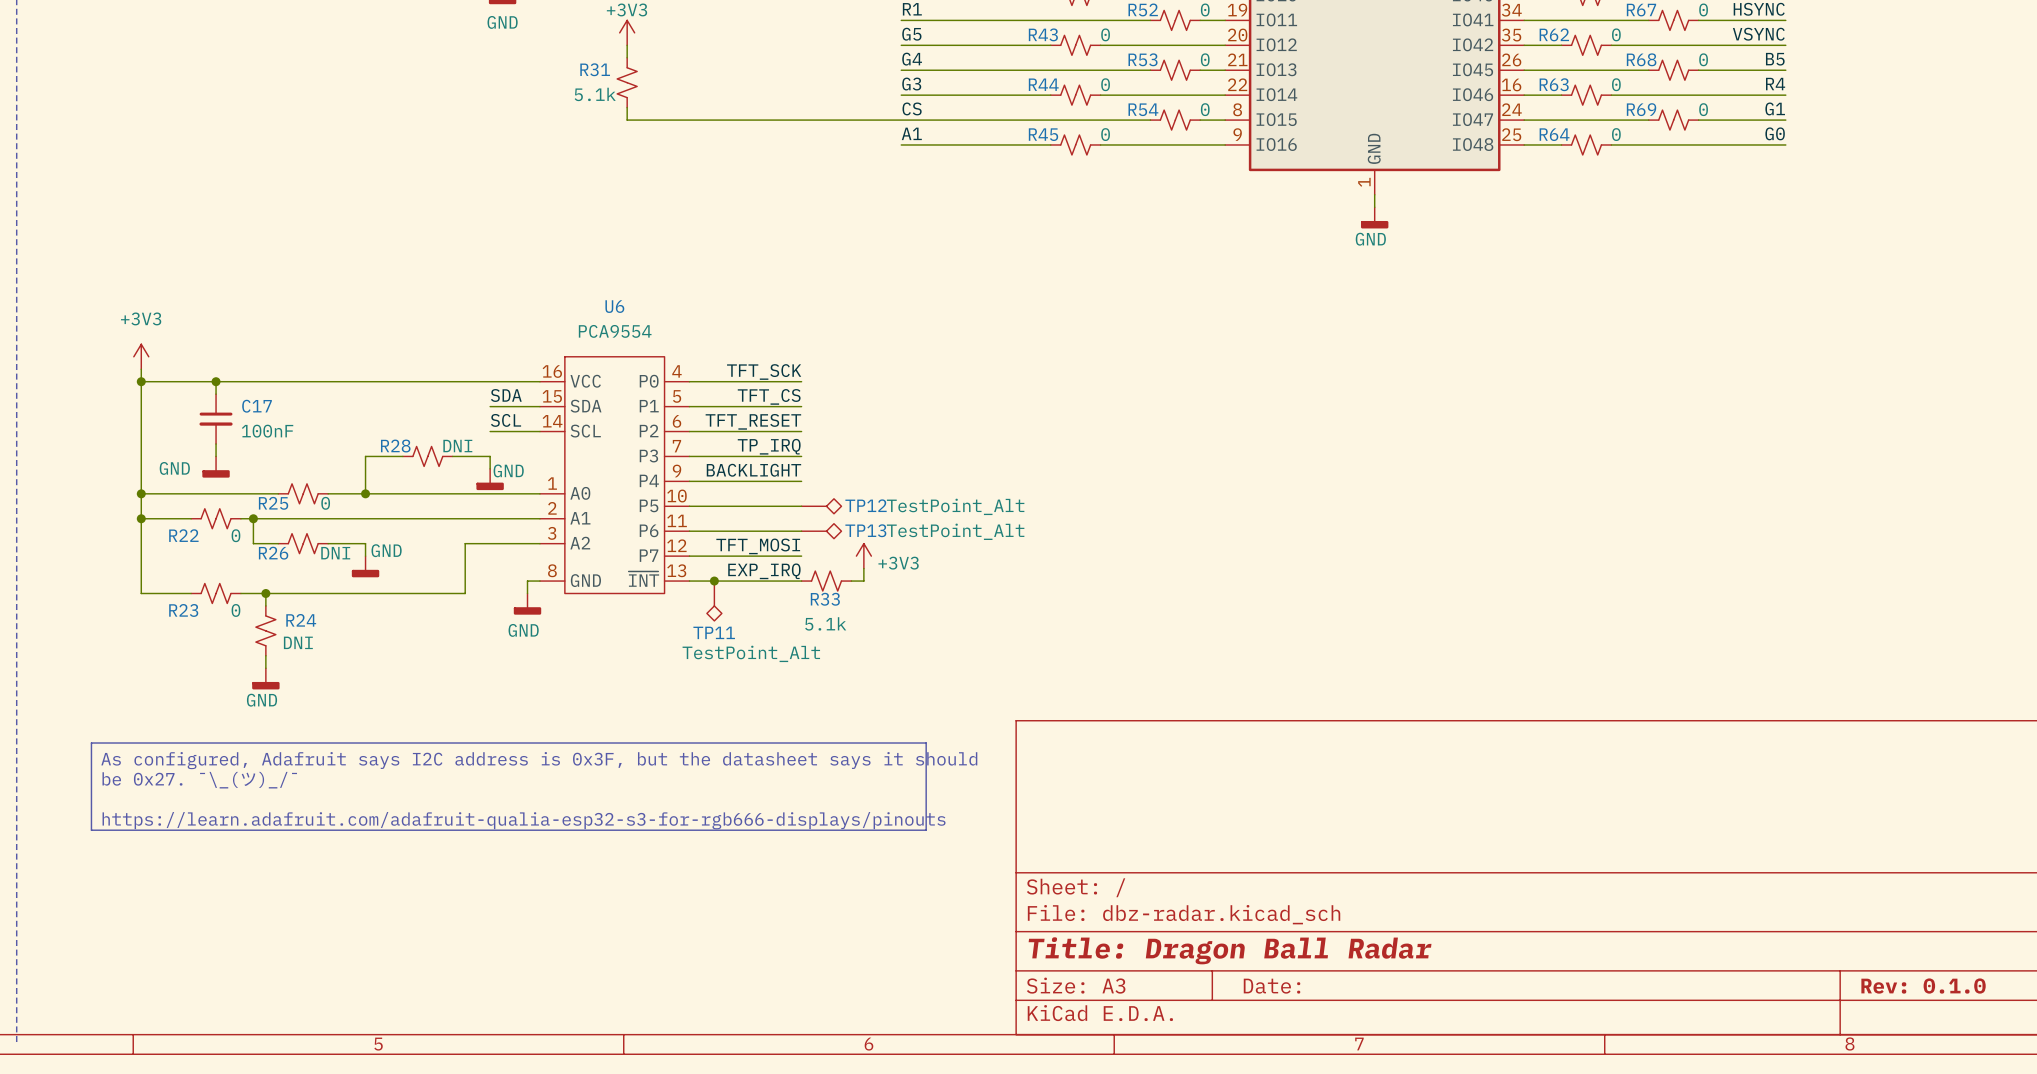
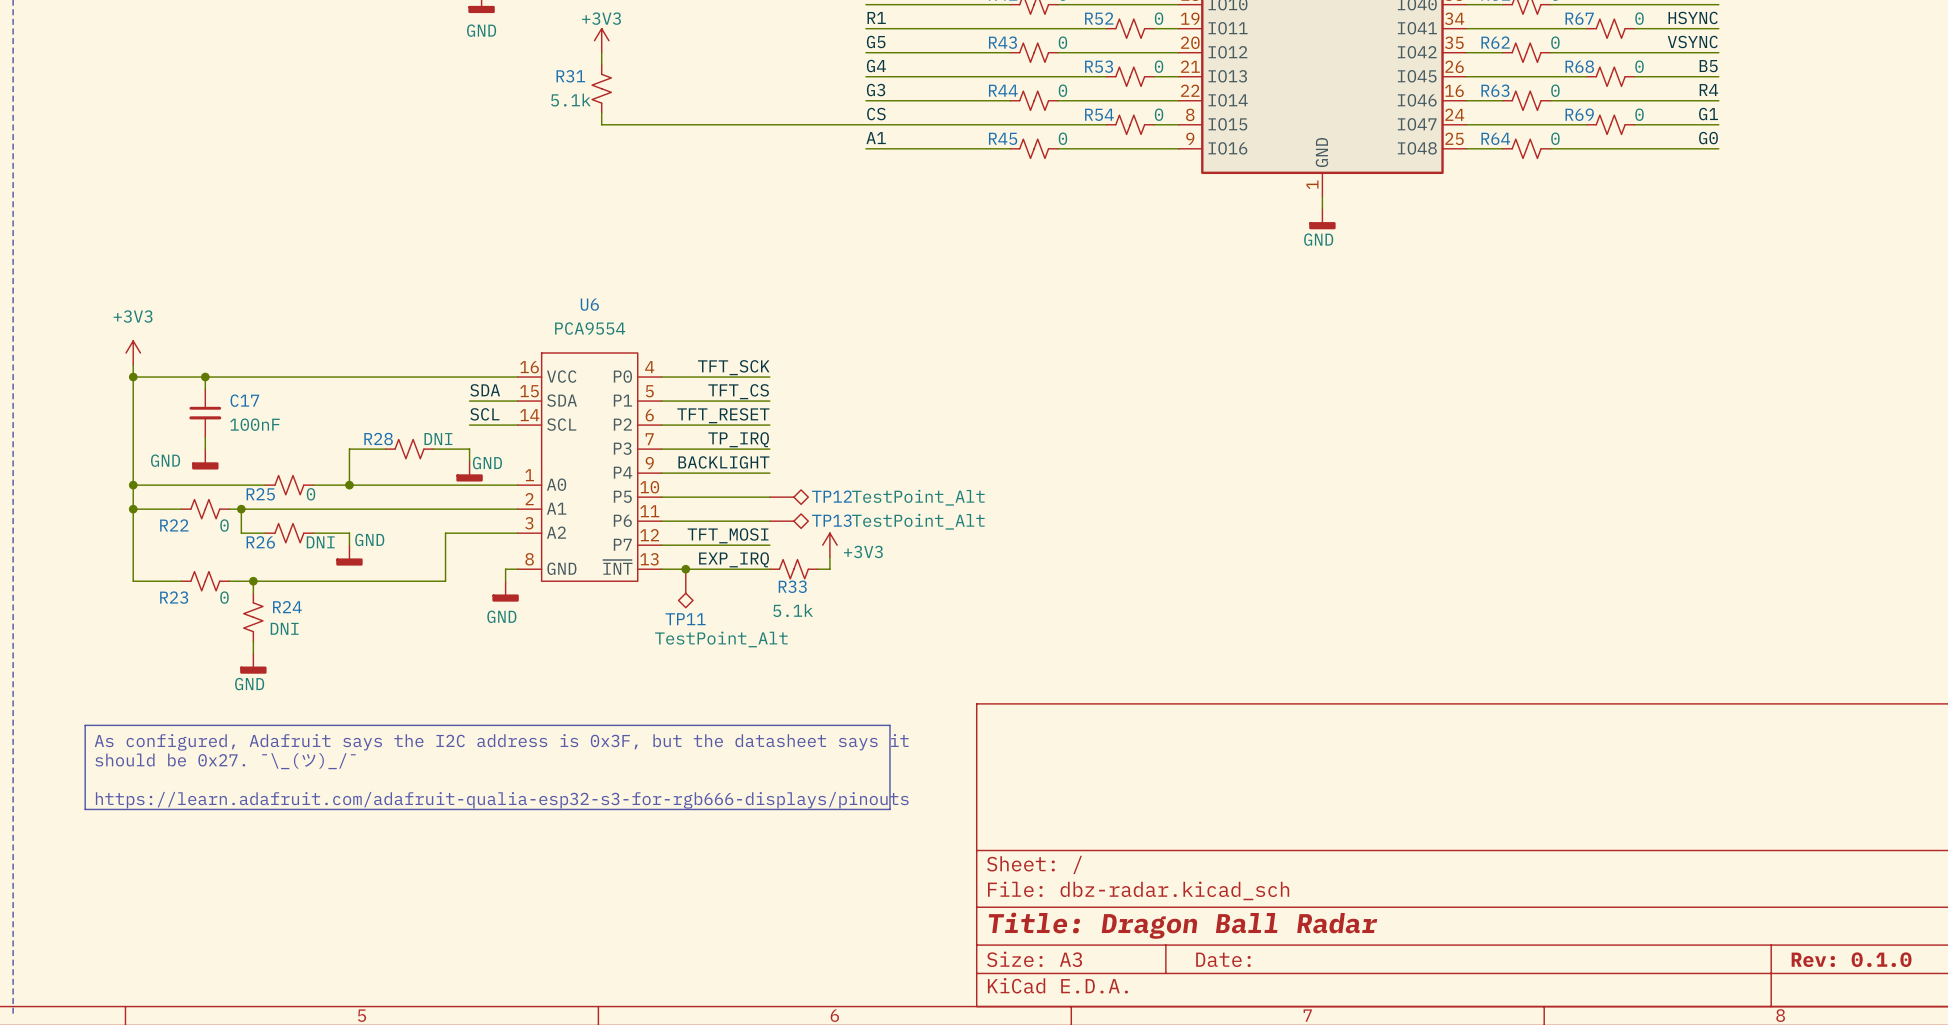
text: As configured, Adafruit says I2C address is 0x3F, but the datasheet says it should (539, 760) -> As configured, Adafruit says the I2C address is 0x3F, but the datasheet says it (501, 742)
text: be 0x27. ¯\_(ツ)_/¯ (199, 780) -> should be 0x27. ¯\_(ツ)_/¯ (225, 761)

